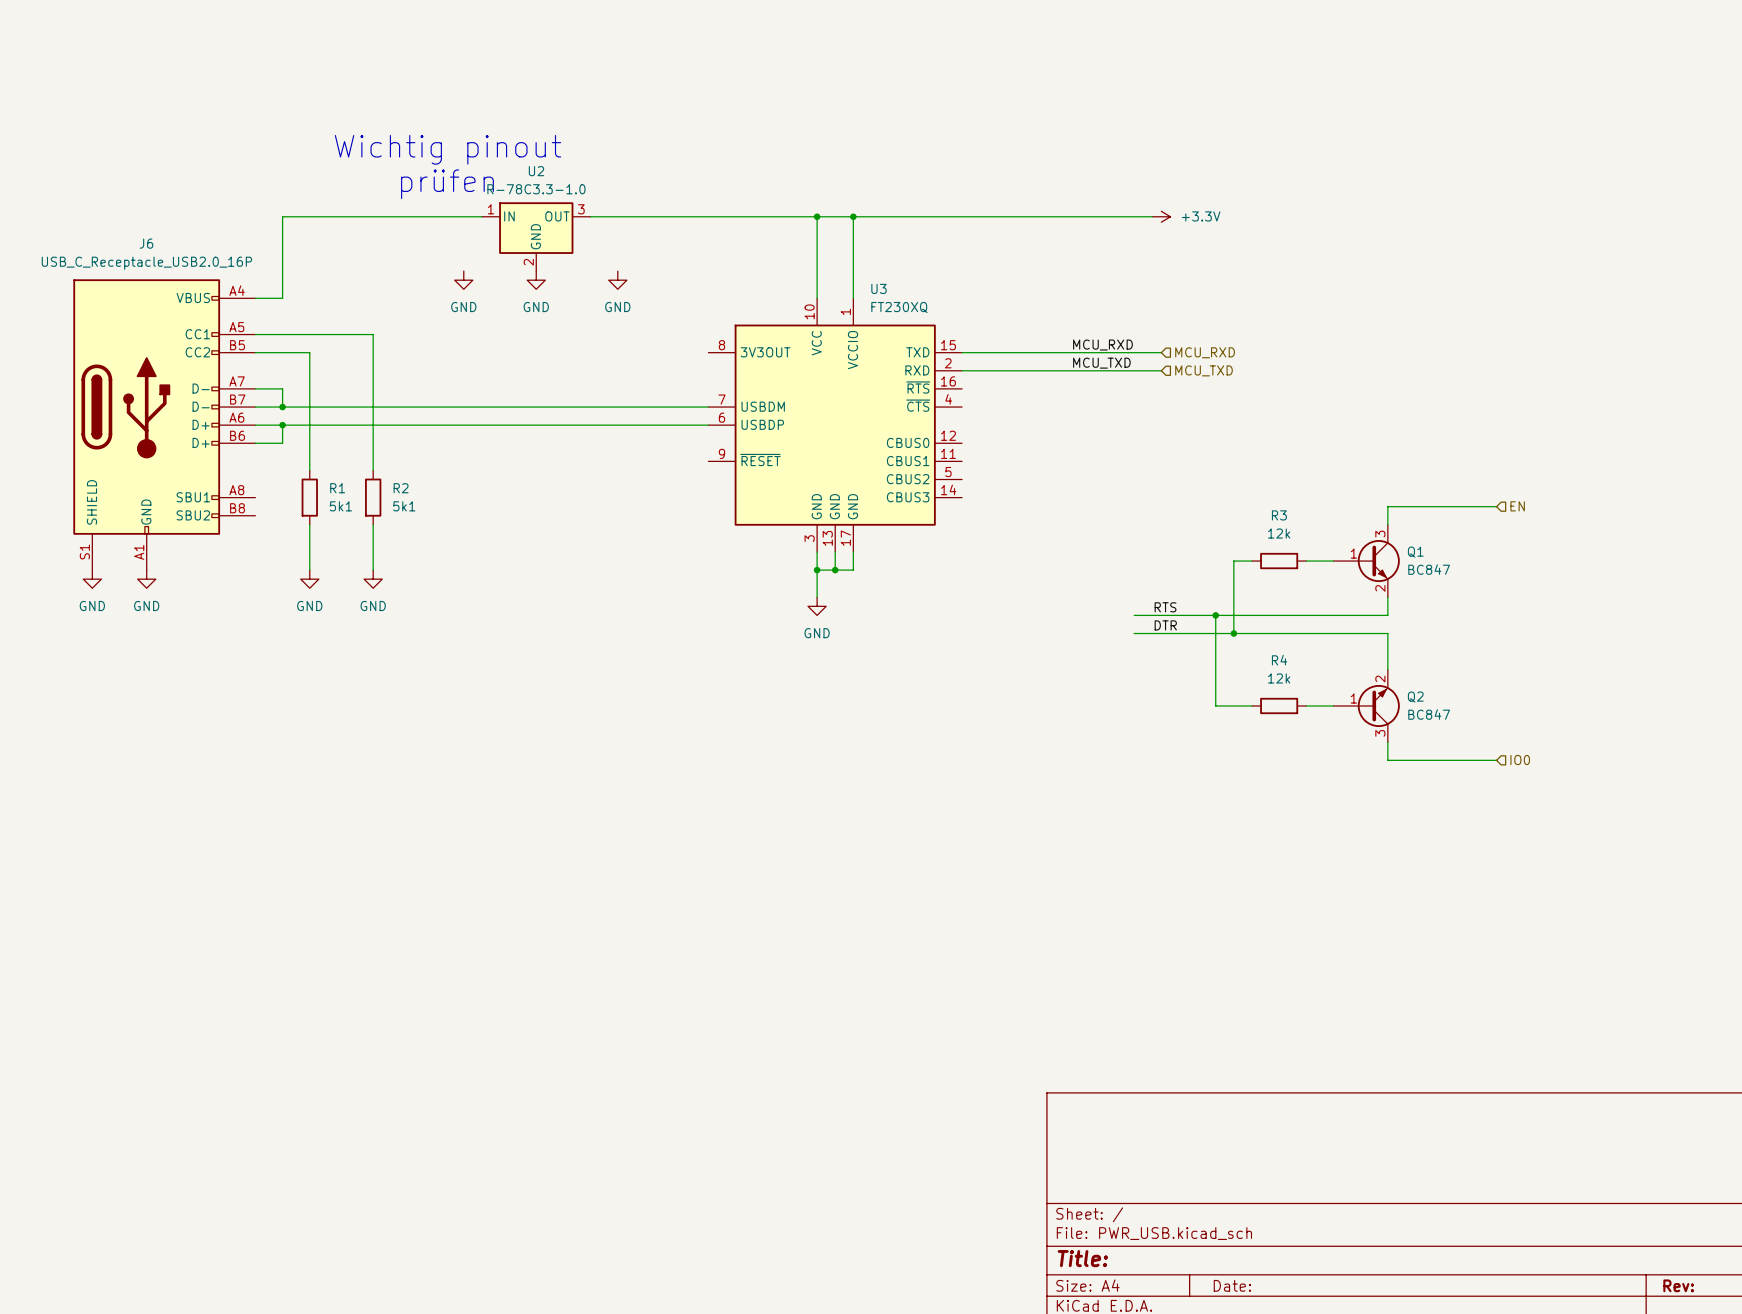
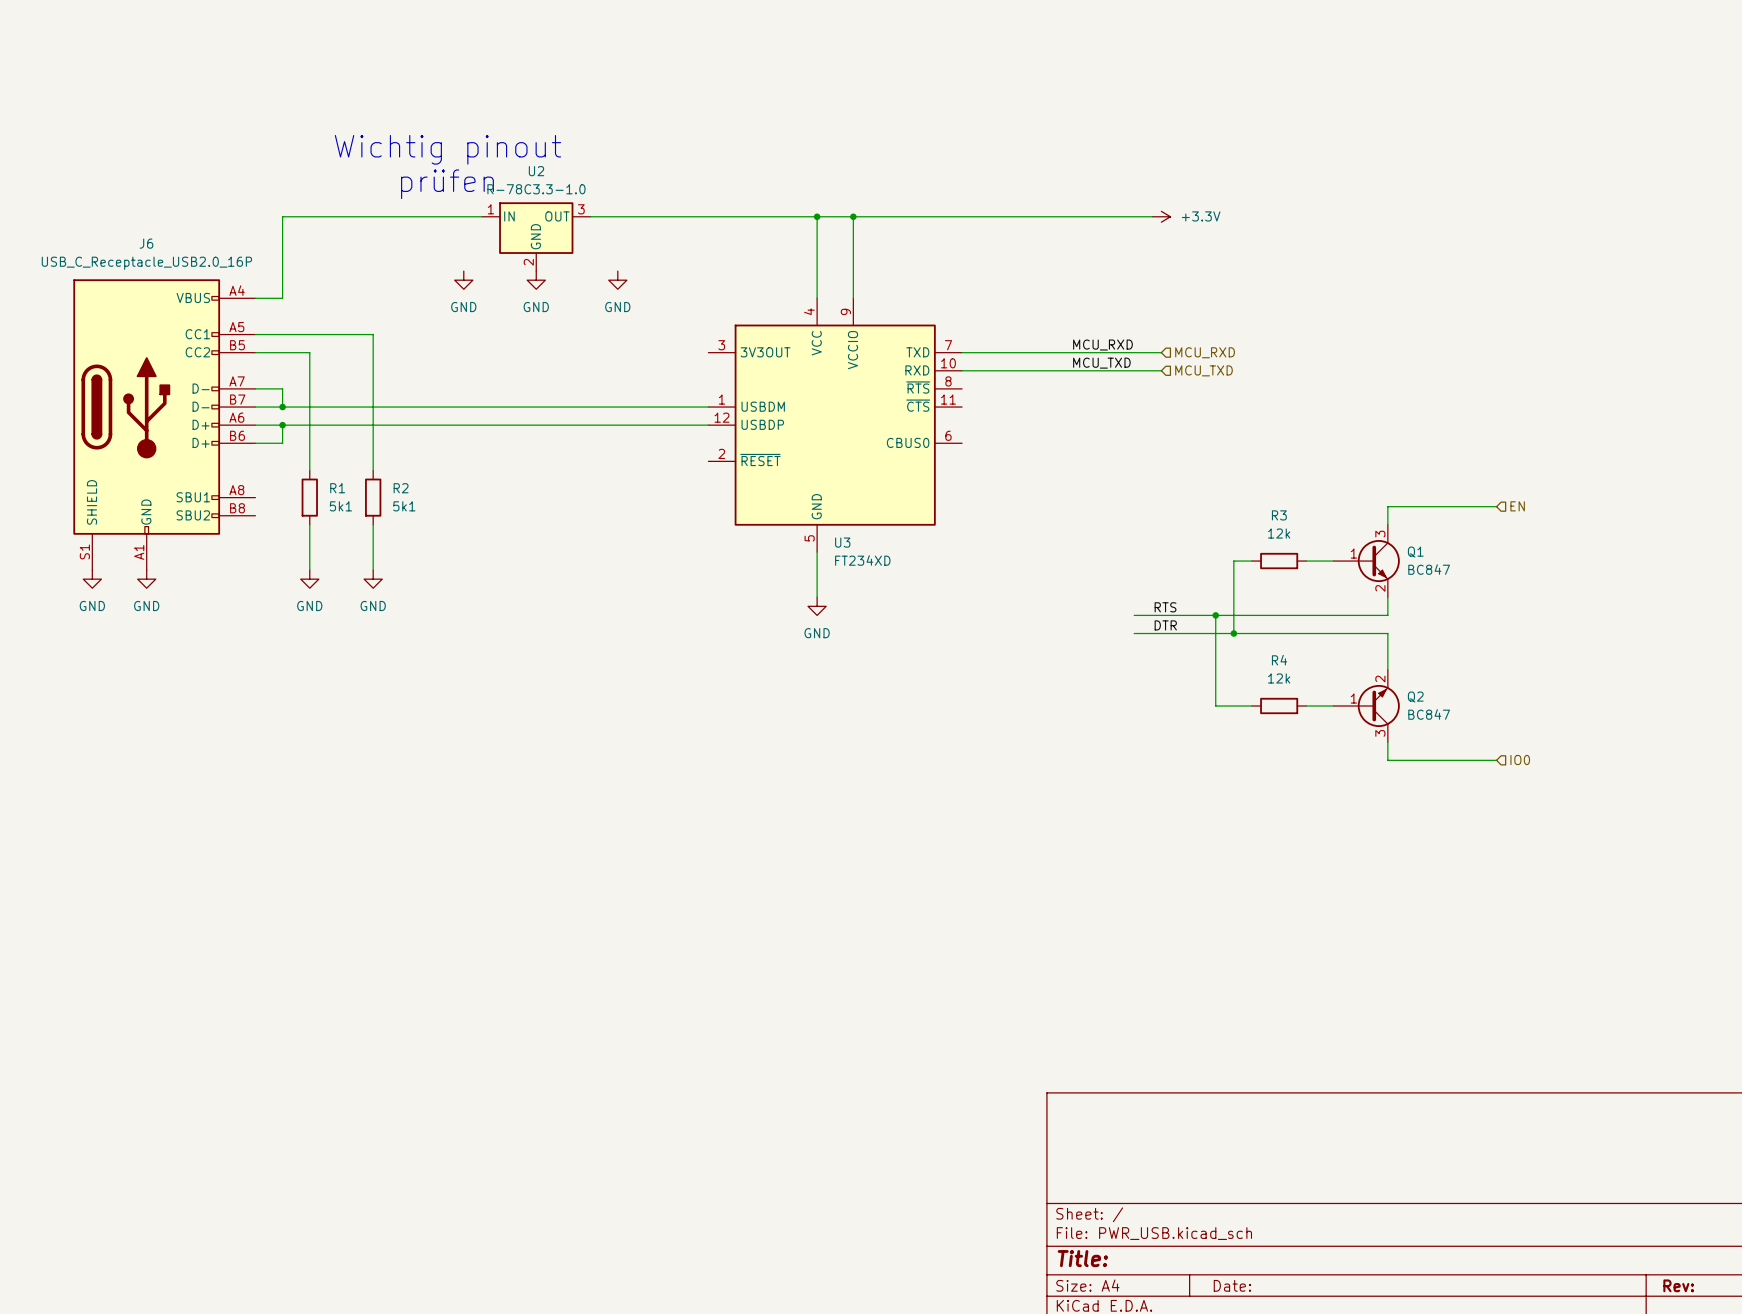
U3 name position: U3 (878, 288) -> U3 (842, 542)
U3 symbol: [708, 298, 963, 552] -> [708, 298, 963, 552]
U3 value: FT230XQ (899, 307) -> FT234XD (862, 560)
wire: (853, 551) (853, 570) (817, 570) -> none
junction: (817, 570) -> none
junction: (835, 570) -> none

